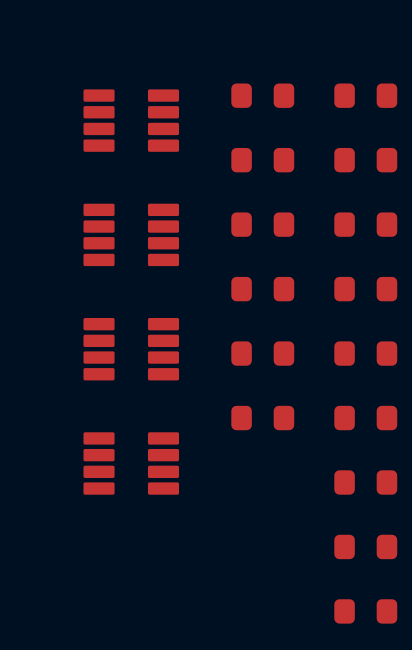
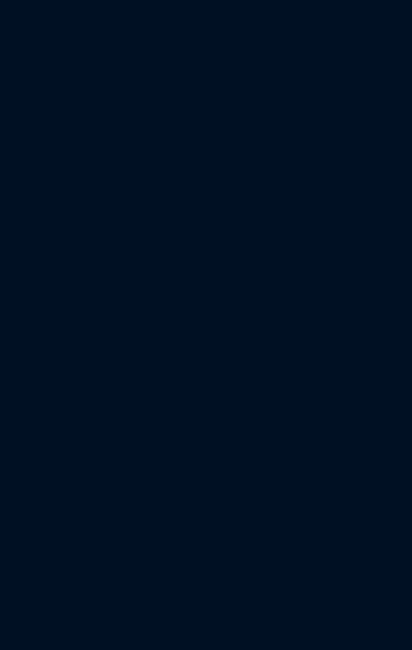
part: (262, 95) -> none
part: (365, 95) -> none
part: (131, 120) -> none
part: (262, 160) -> none
part: (365, 160) -> none
part: (262, 224) -> none
part: (365, 224) -> none
part: (131, 234) -> none
part: (262, 289) -> none
part: (365, 289) -> none
part: (131, 349) -> none
part: (262, 353) -> none
part: (365, 353) -> none
part: (262, 418) -> none
part: (365, 418) -> none
part: (131, 463) -> none
part: (365, 482) -> none
part: (365, 546) -> none
part: (365, 611) -> none

